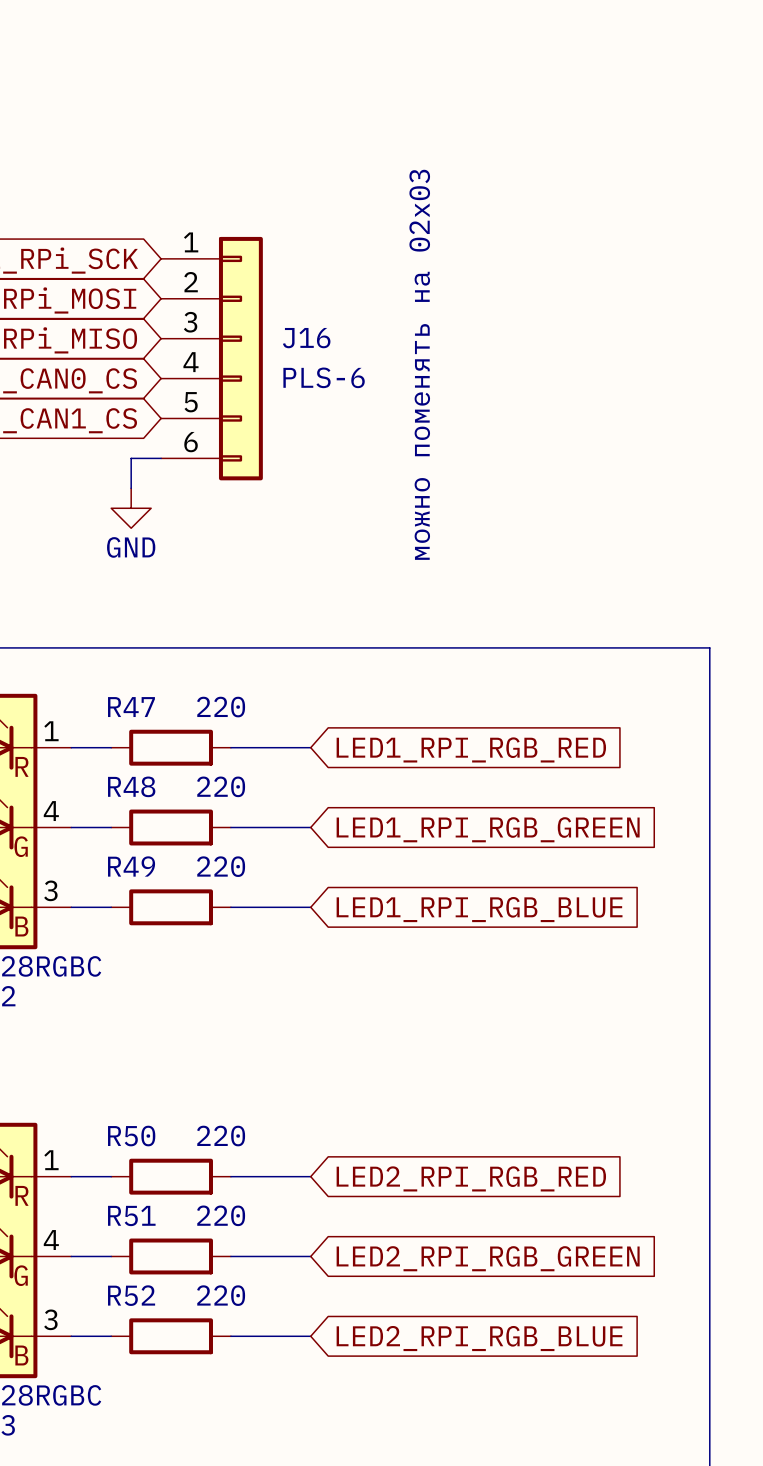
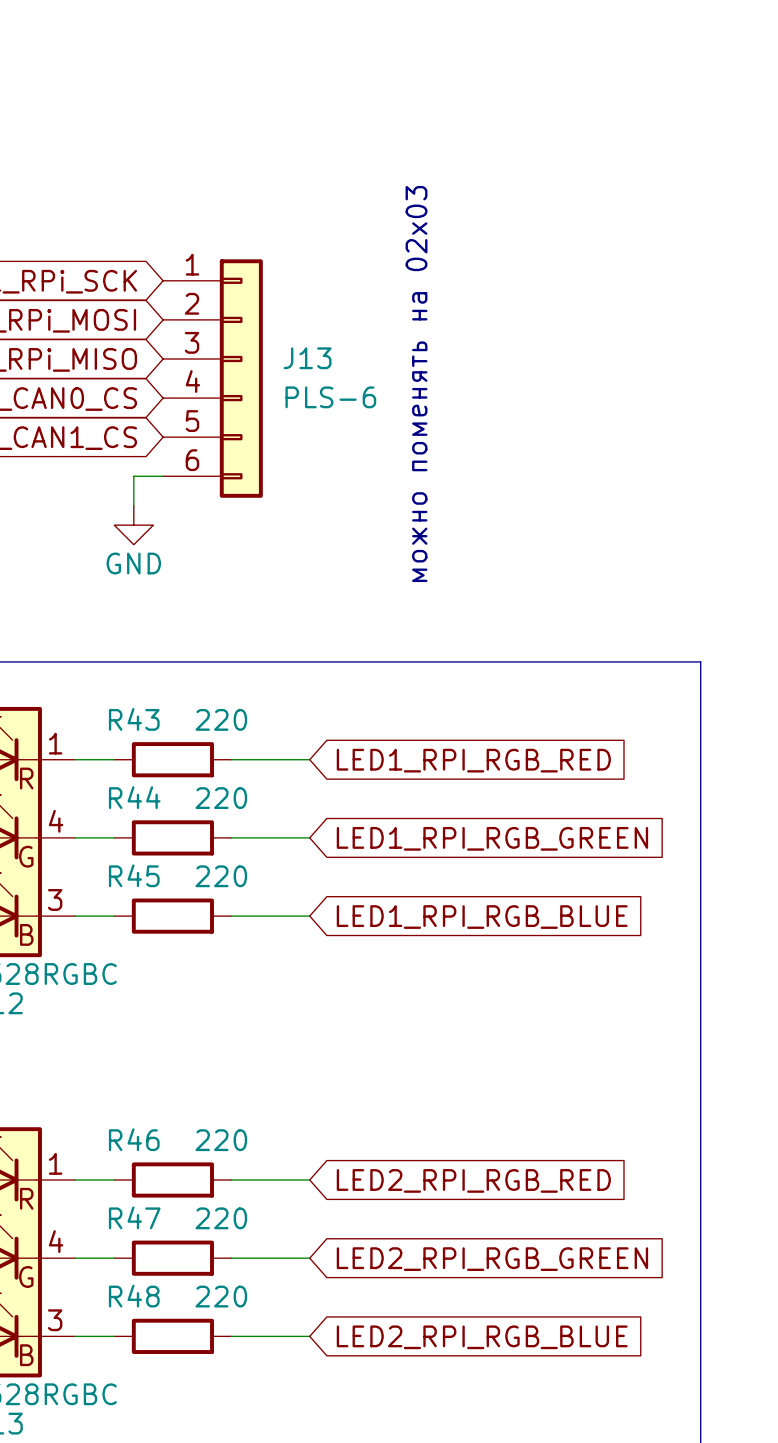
J16 name: J16 (306, 338) -> J13 (307, 358)
R47 name: R47 (131, 707) -> R43 (134, 719)
R48 name: R48 (131, 786) -> R44 (134, 797)
R49 name: R49 (131, 866) -> R45 (134, 875)
R50 name: R50 (131, 1136) -> R46 (134, 1139)
R51 name: R51 (131, 1216) -> R47 (134, 1217)
R52 name: R52 (131, 1295) -> R48 (134, 1296)

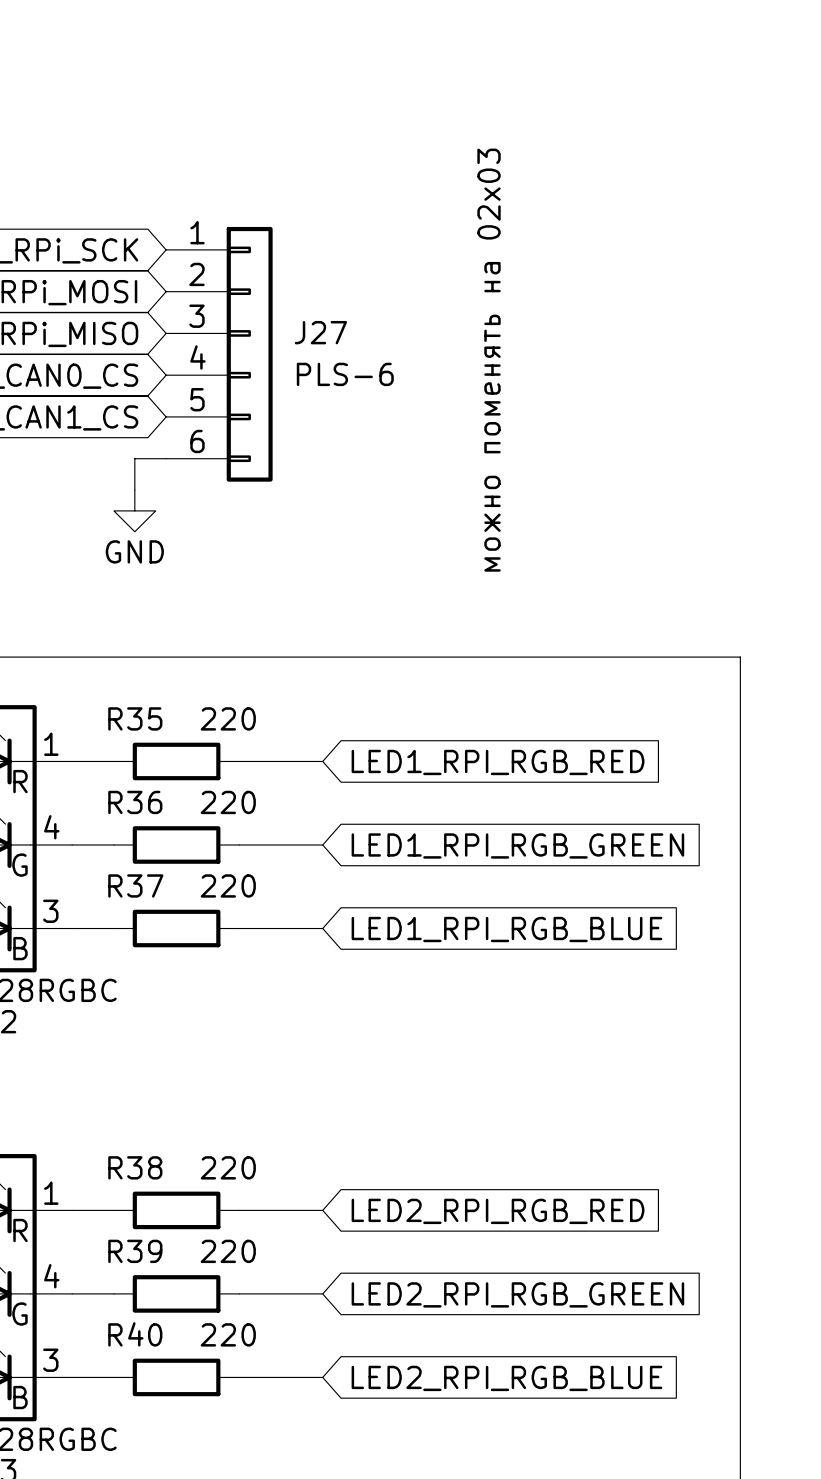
J13 name: J13 (307, 358) -> J27 (320, 332)
text position: можно поменять на 02х03 (416, 384) -> можно поменять на 02х03 (489, 360)
R43 name: R43 (134, 719) -> R35 (135, 718)
R44 name: R44 (134, 797) -> R36 (135, 802)
R45 name: R45 (134, 875) -> R37 (135, 885)
R46 name: R46 (134, 1139) -> R38 (135, 1167)
R47 name: R47 (134, 1217) -> R39 (135, 1251)
R48 name: R48 (134, 1296) -> R40 (135, 1334)

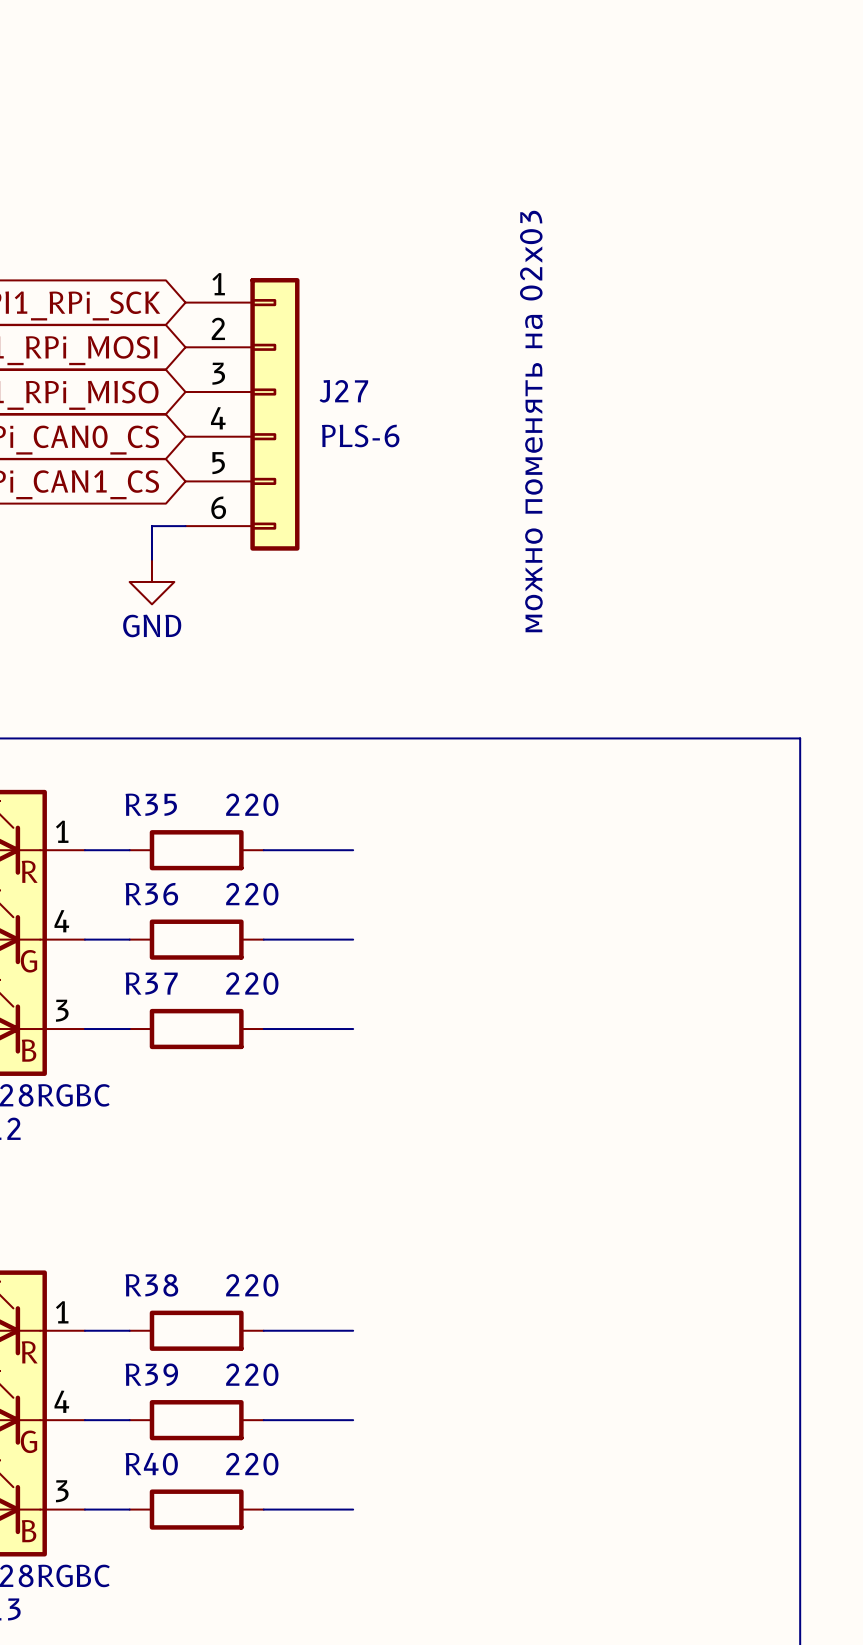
global label: LED1_RPI_RGB_RED (498, 762) -> none
global label: LED1_RPI_RGB_GREEN (517, 845) -> none
global label: LED1_RPI_RGB_BLUE (506, 929) -> none
global label: LED2_RPI_RGB_RED (498, 1211) -> none
global label: LED2_RPI_RGB_GREEN (517, 1294) -> none
global label: LED2_RPI_RGB_BLUE (506, 1378) -> none

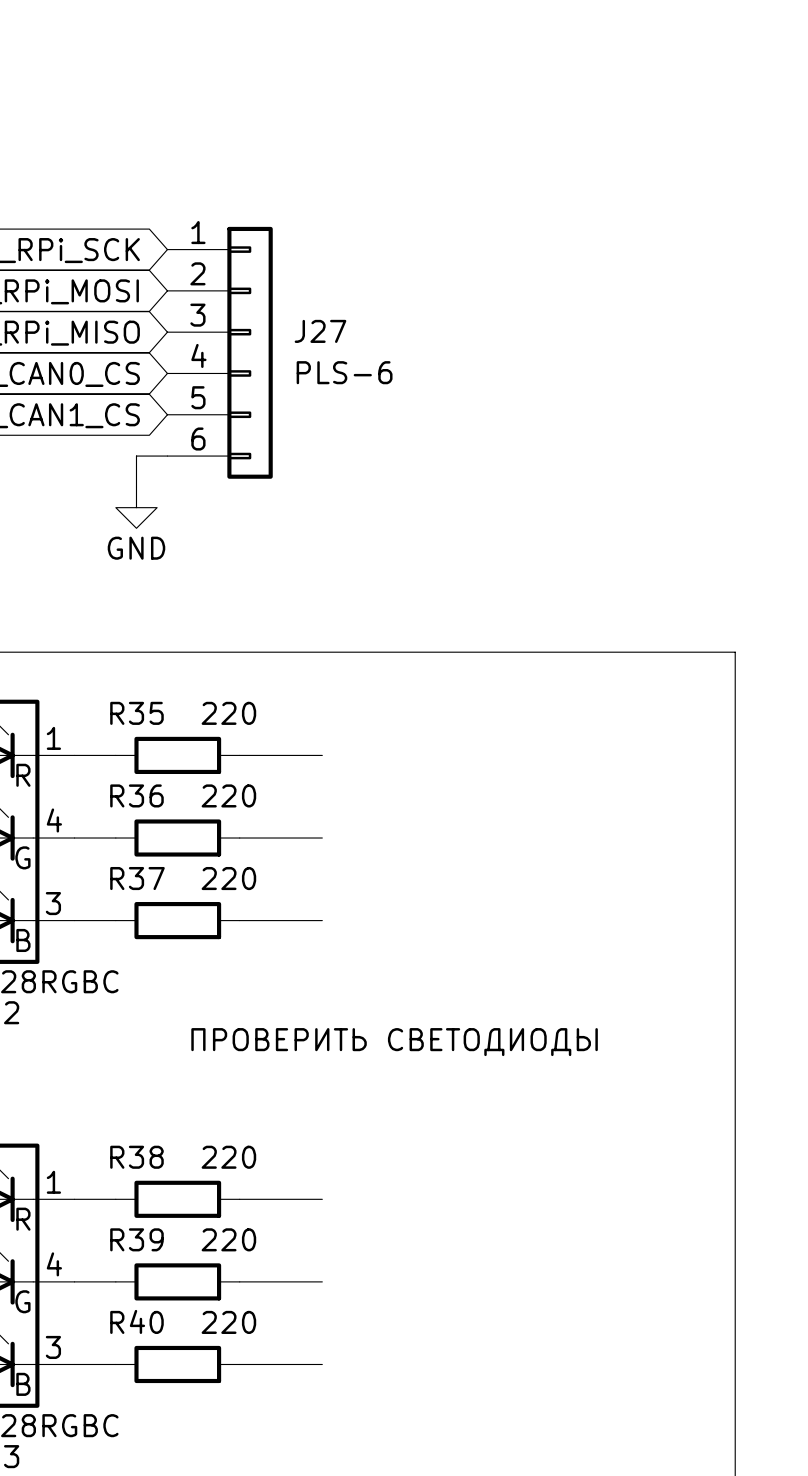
text: можно поменять на 02х03 (531, 421) -> none
text: none -> ПРОВЕРИТЬ СВЕТОДИОДЫ (394, 1042)

